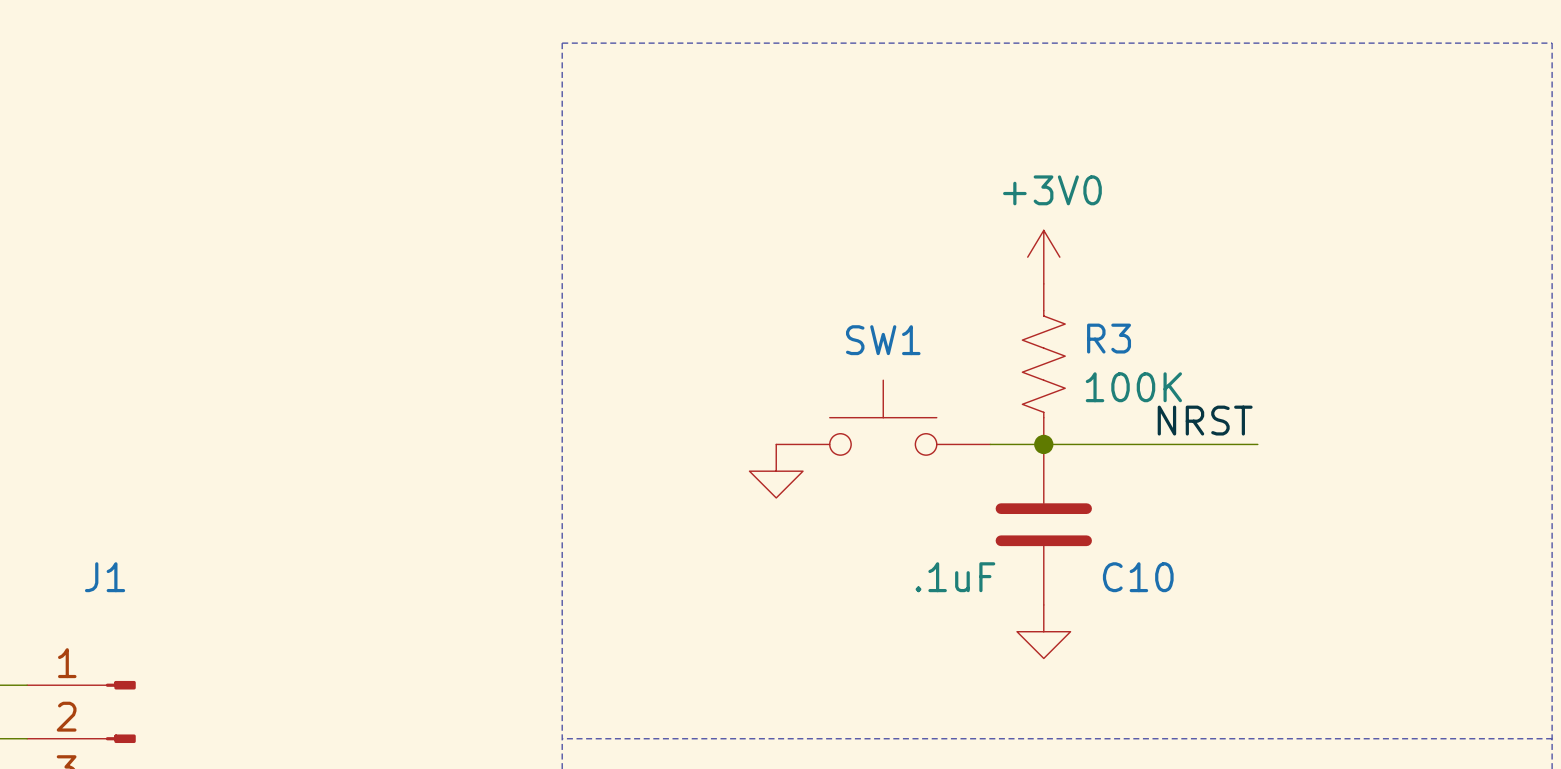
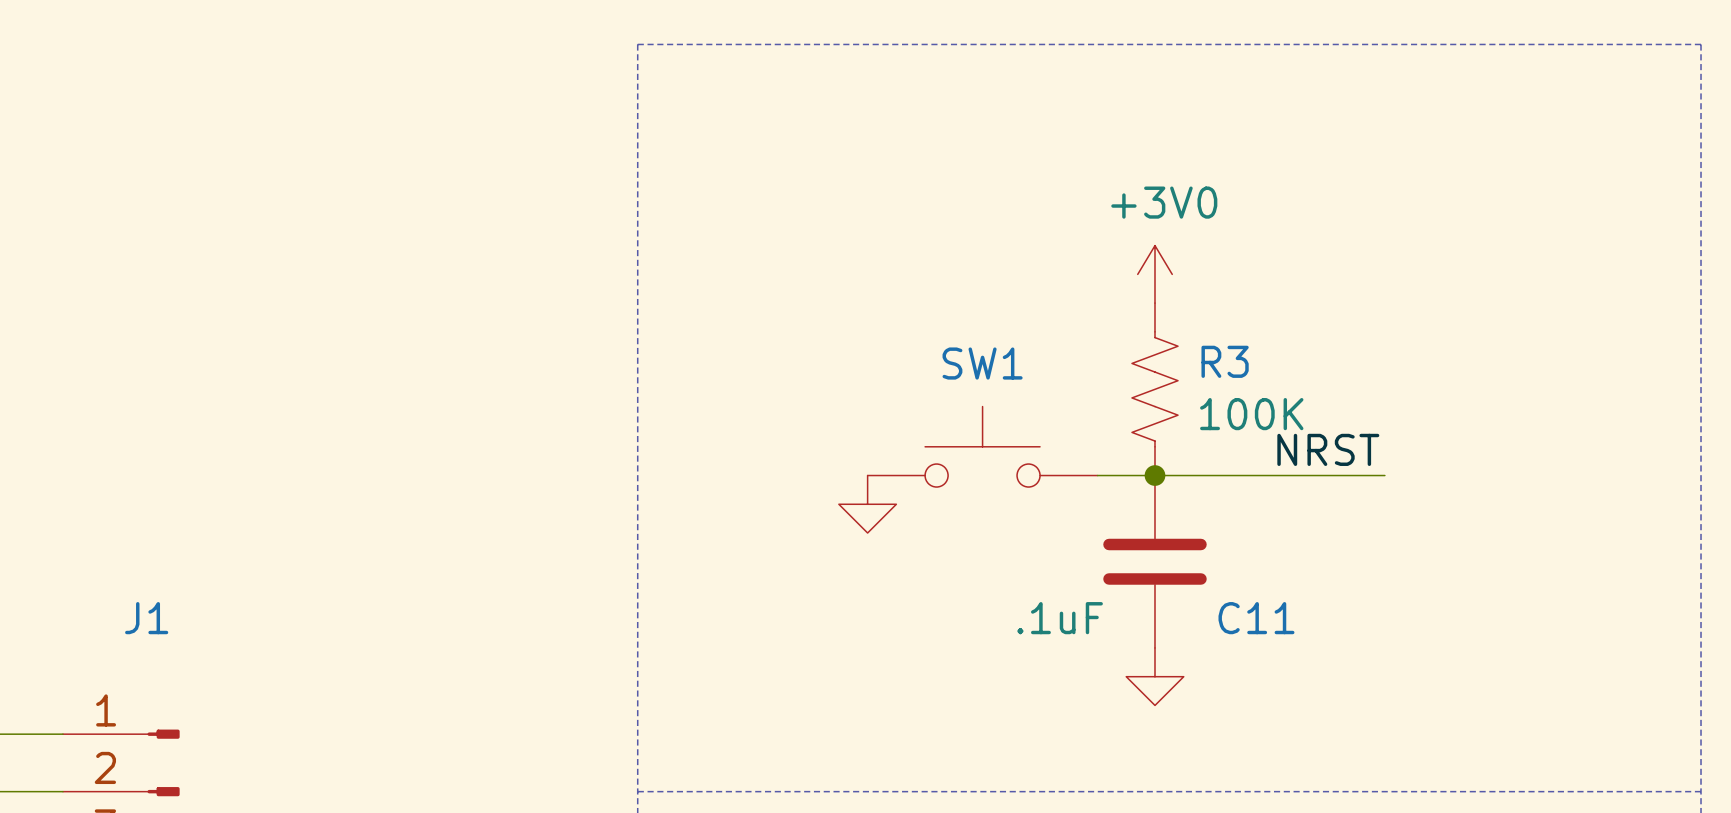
C10 name: C10 (1138, 577) -> C11 (1256, 618)

